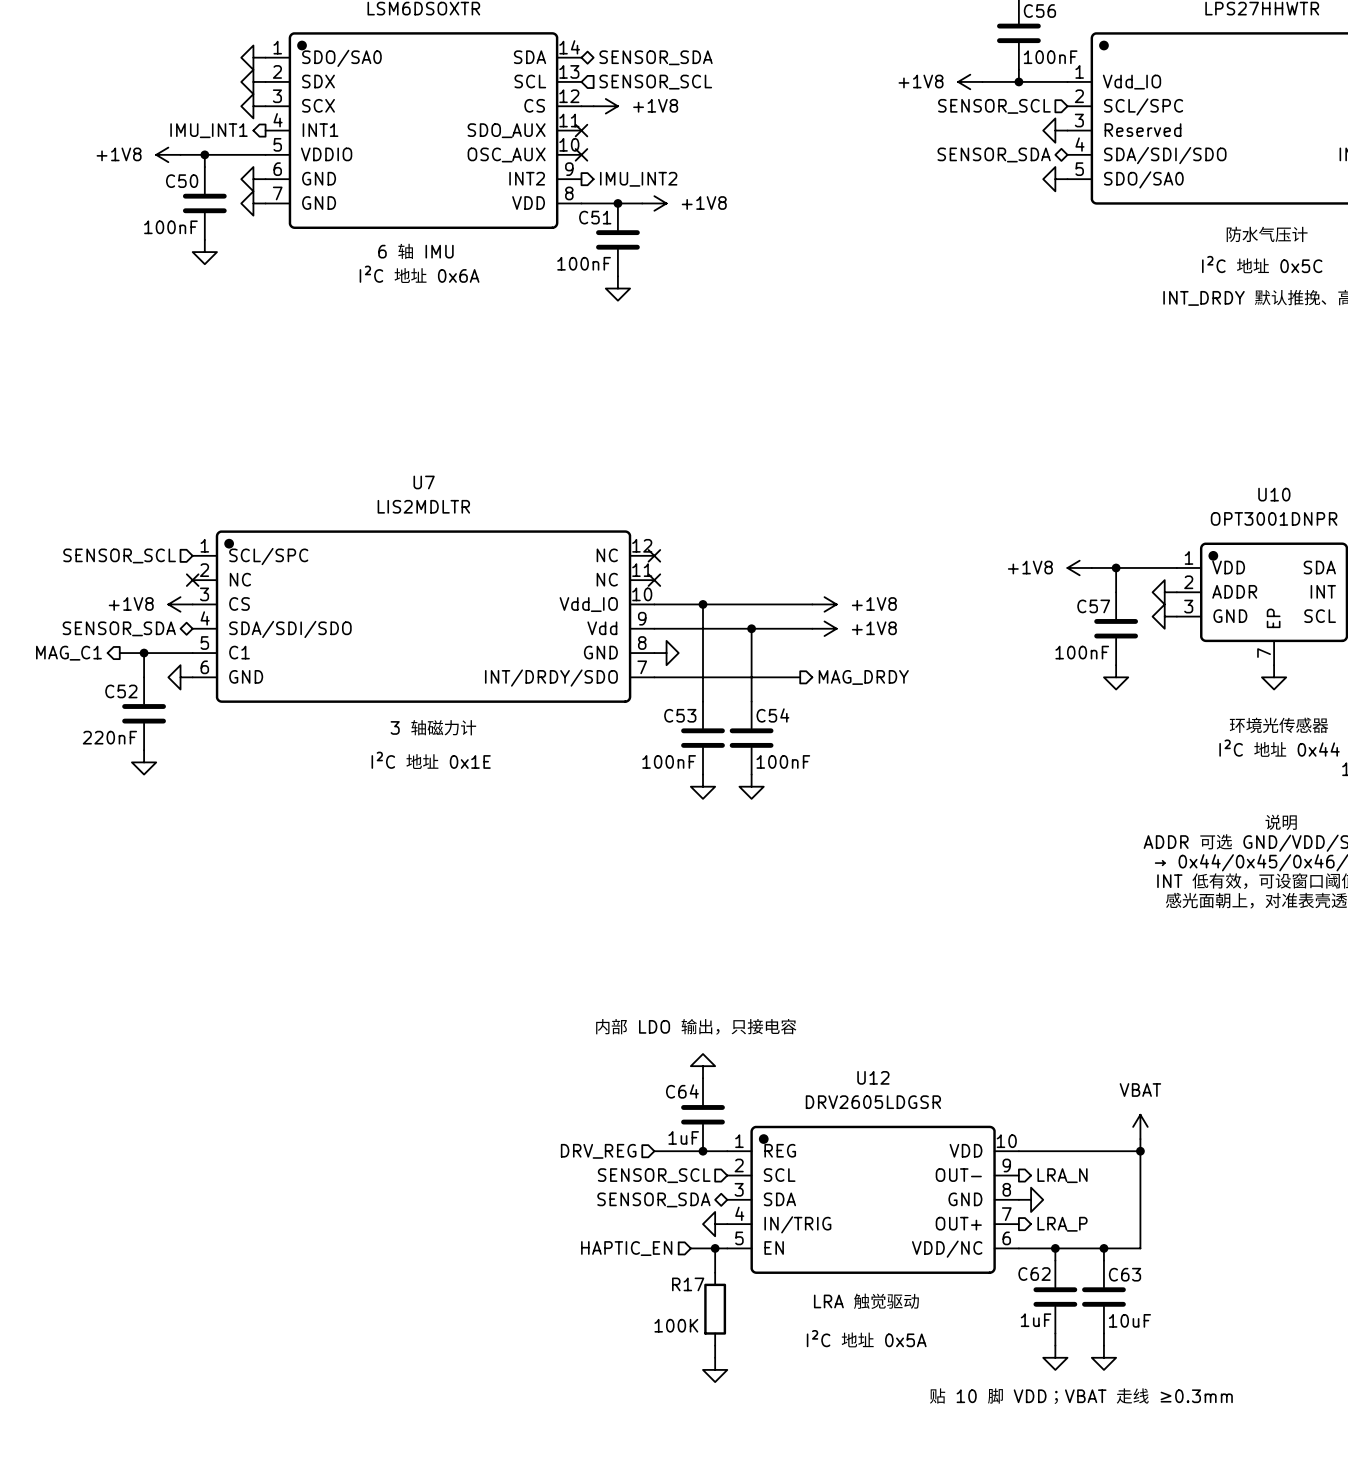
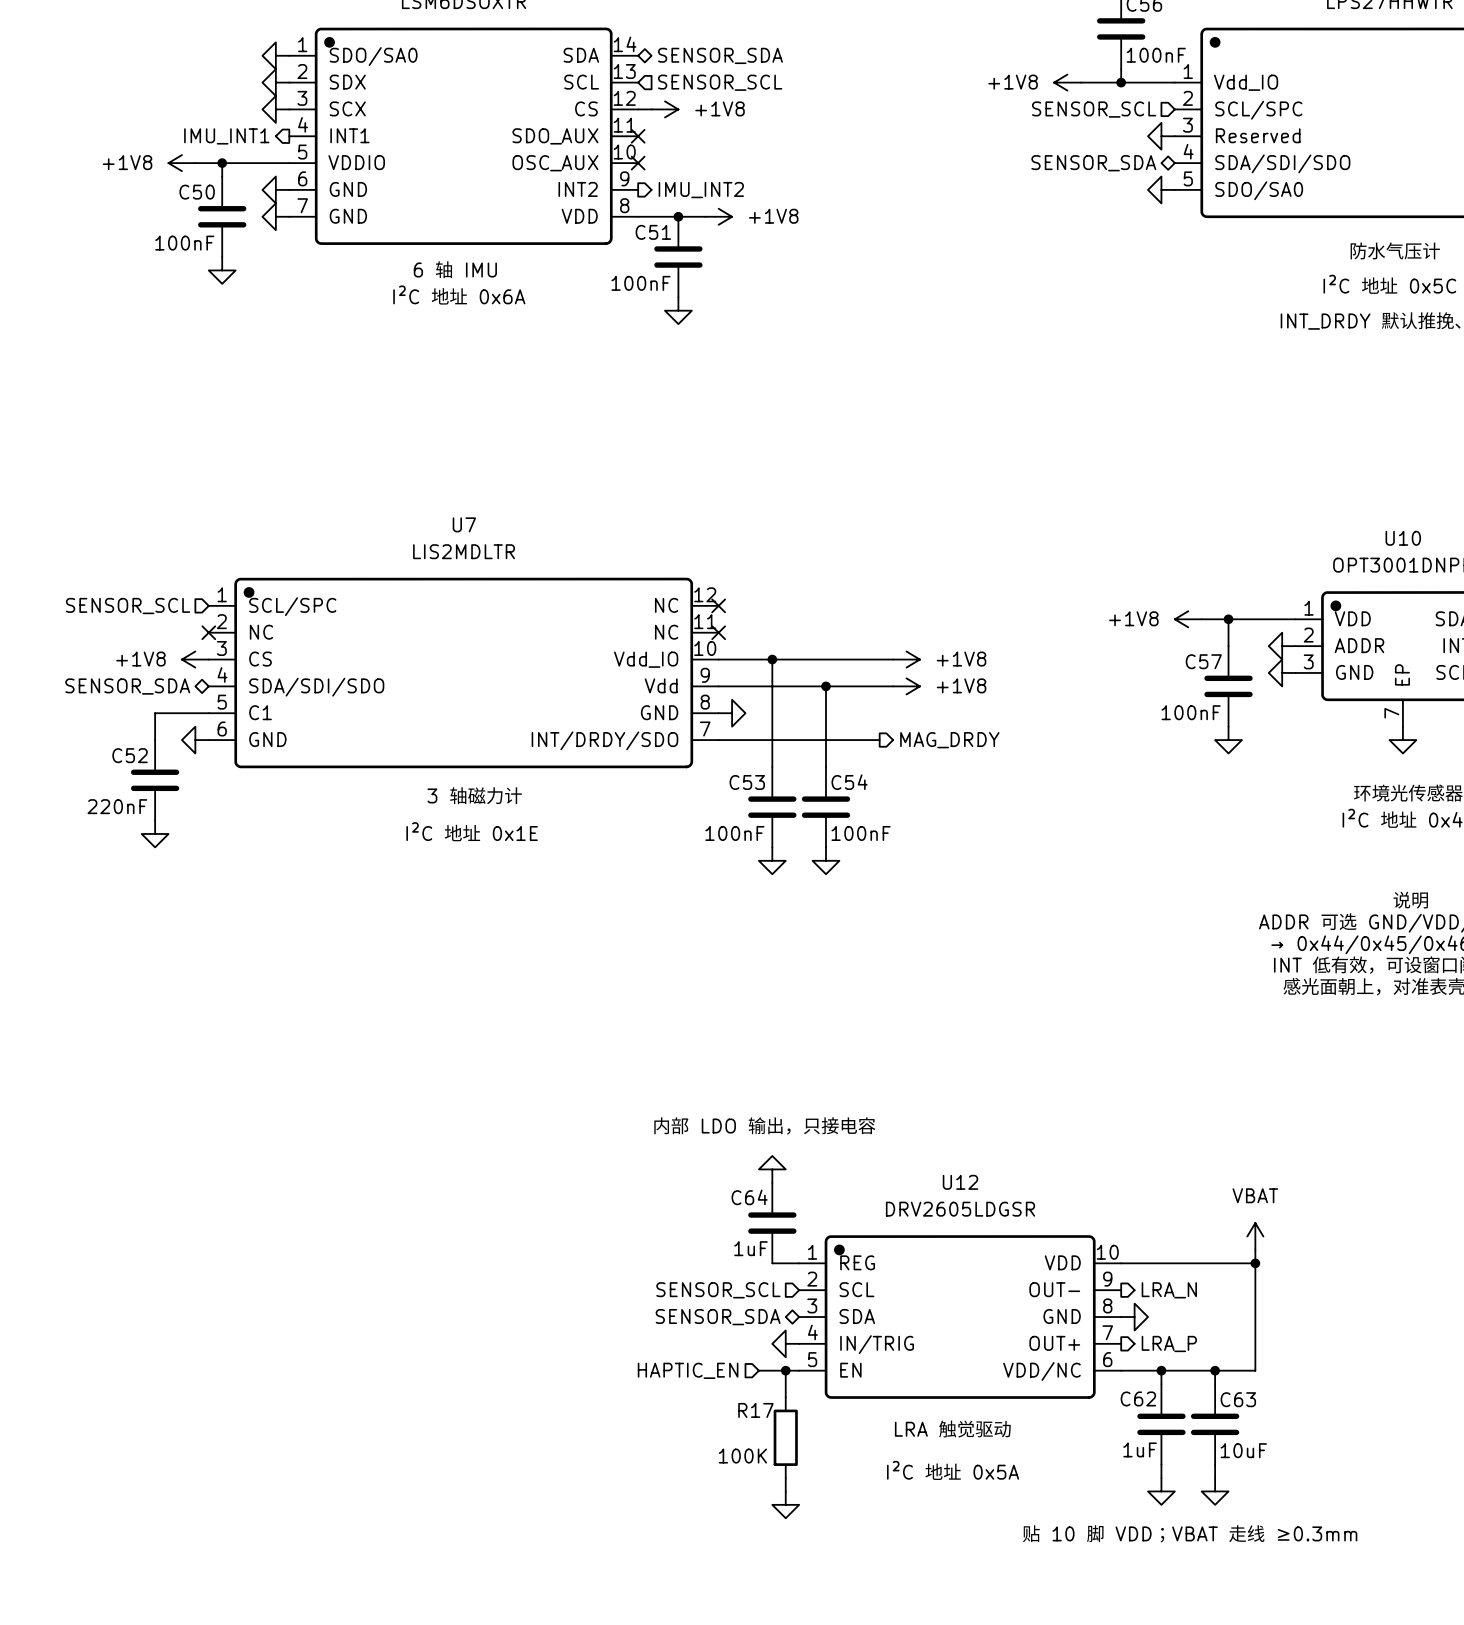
hierarchical label: MAG_C1 (68, 653) -> none
wire: (119, 653) (144, 653) -> none
junction: (144, 653) -> none
hierarchical label: DRV_REG (598, 1151) -> none
wire: (654, 1151) (703, 1151) -> none
junction: (703, 1151) -> none

